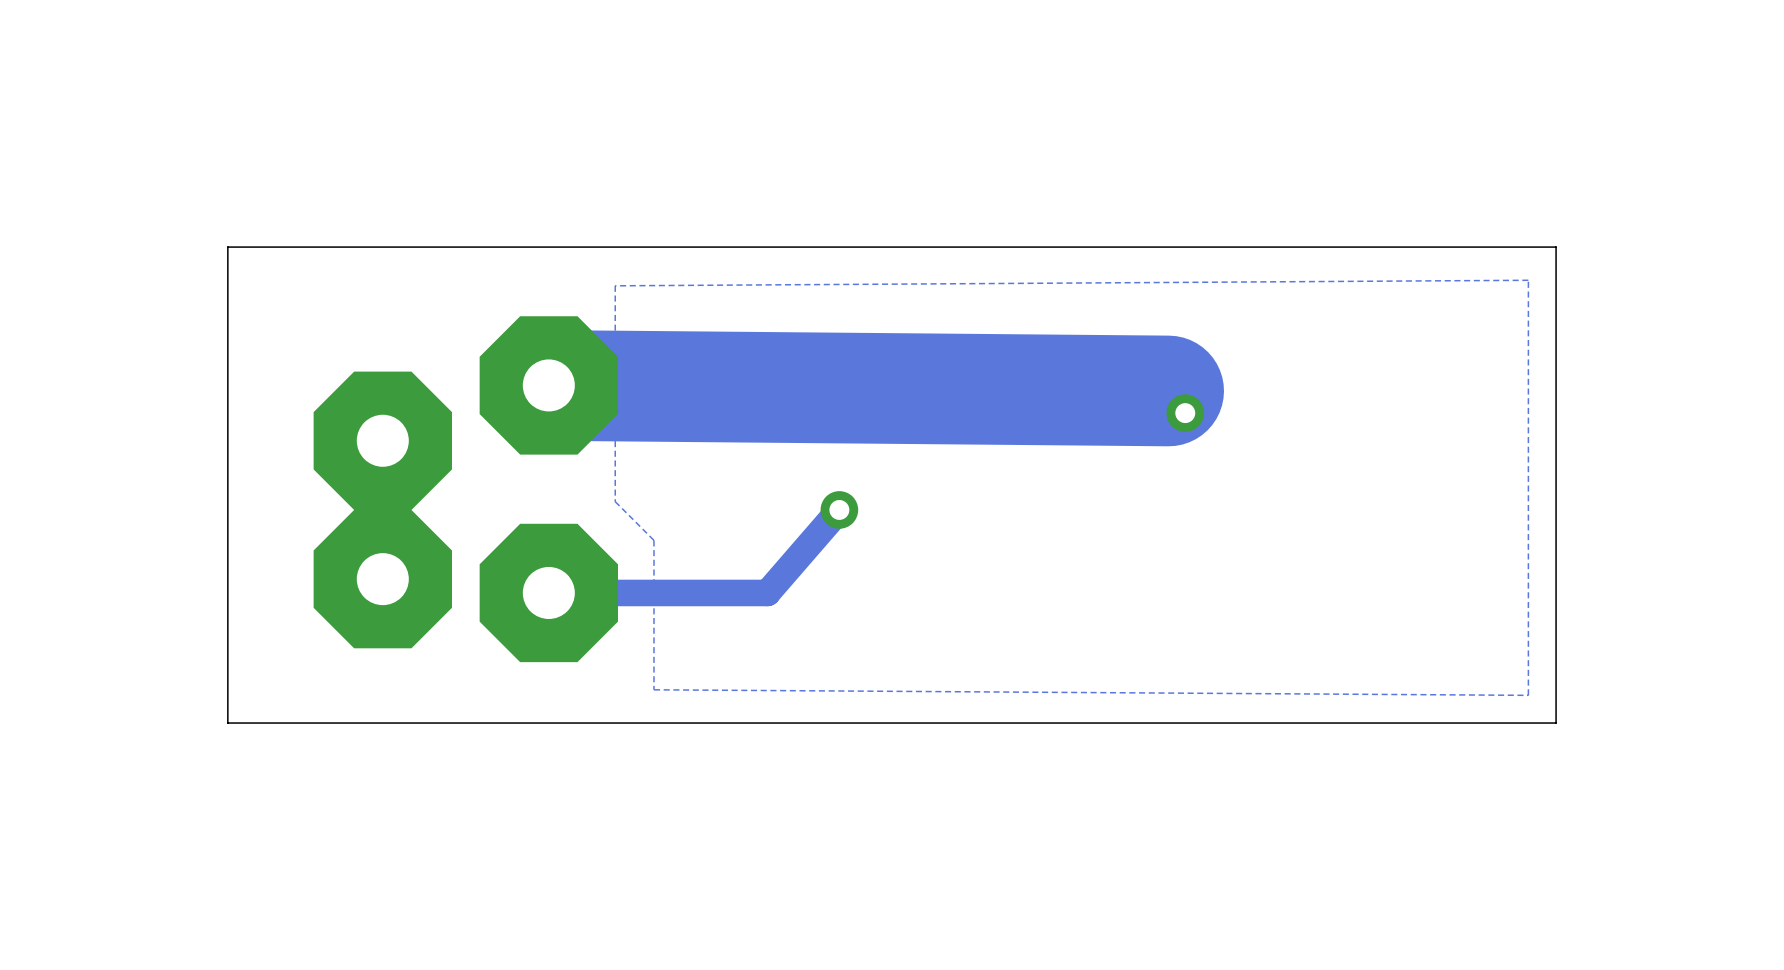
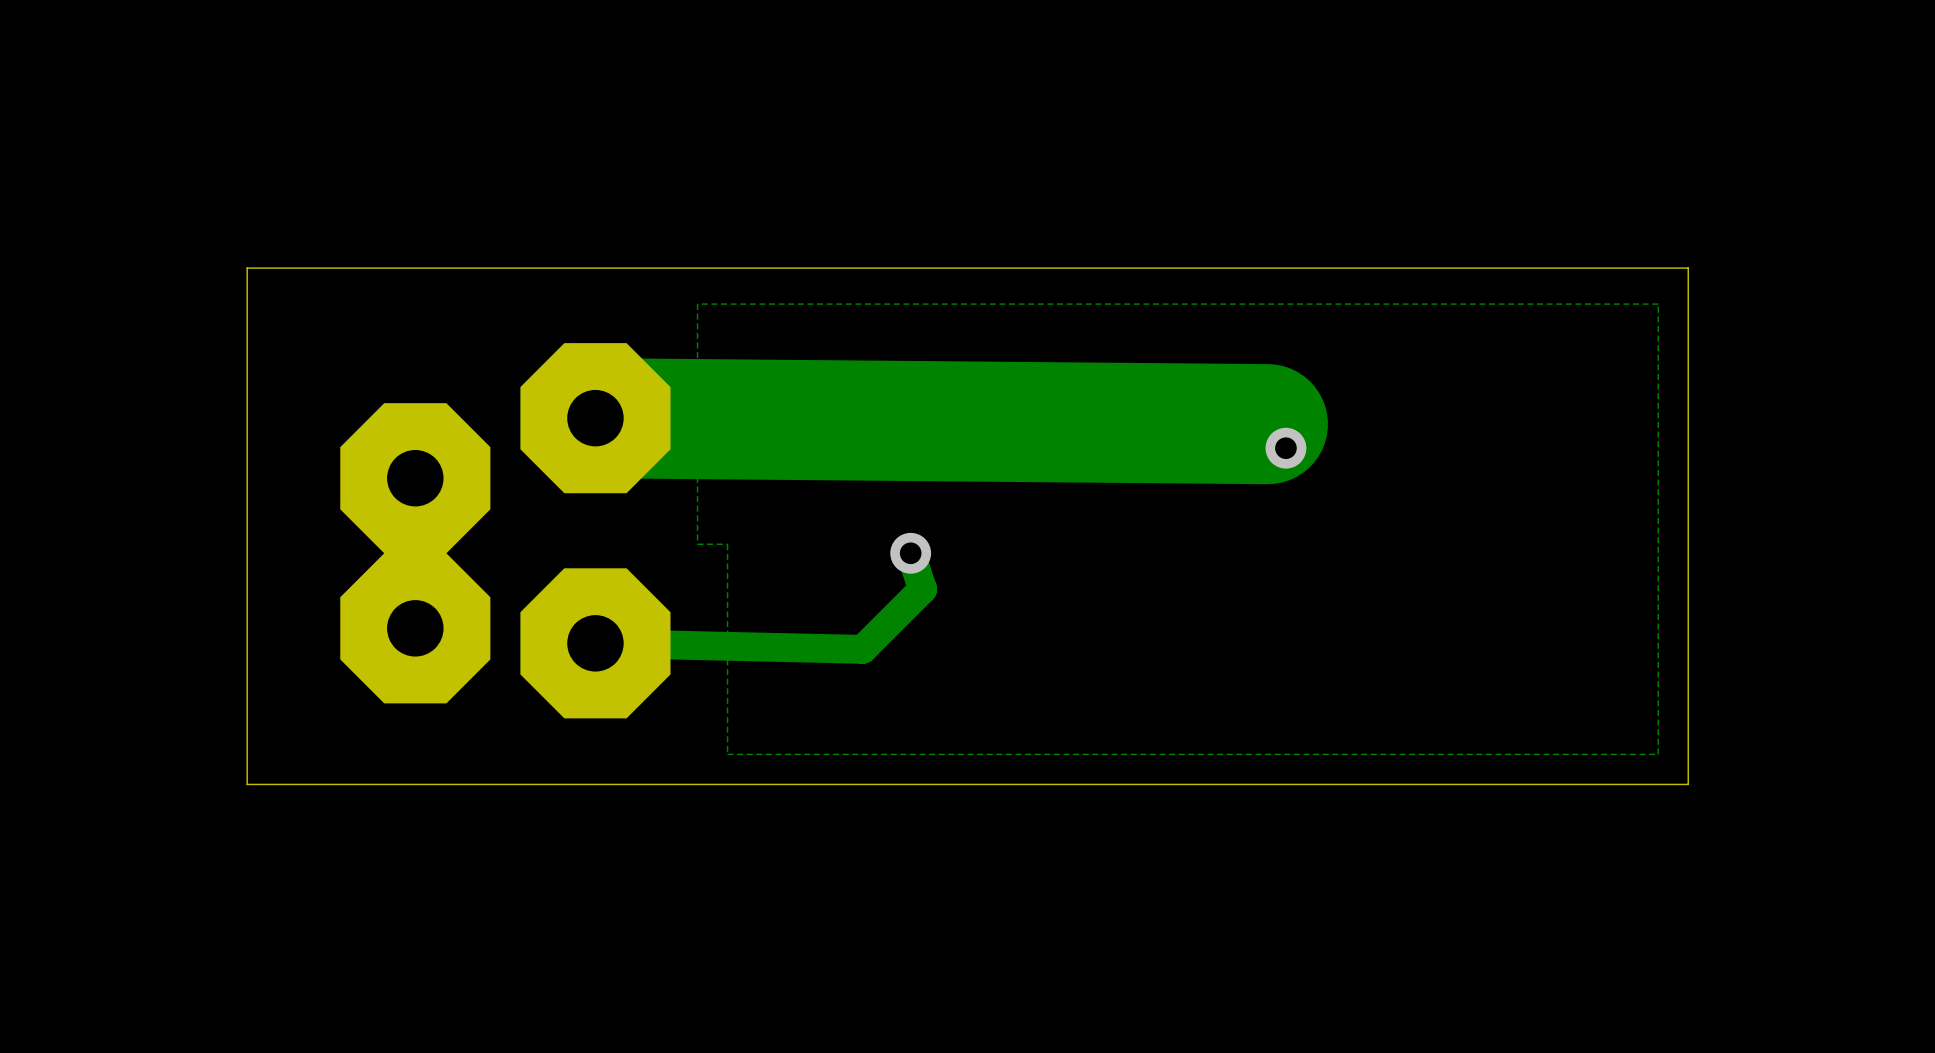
zone outline: (1528, 280) (615, 285) (615, 501) (653, 540) (653, 689) (1528, 695) -> (1658, 304) (697, 304) (697, 544) (727, 544) (727, 754) (1658, 754)
track: (839, 509) (767, 592) (548, 592) -> (910, 553) (922, 589) (862, 649) (595, 643)

